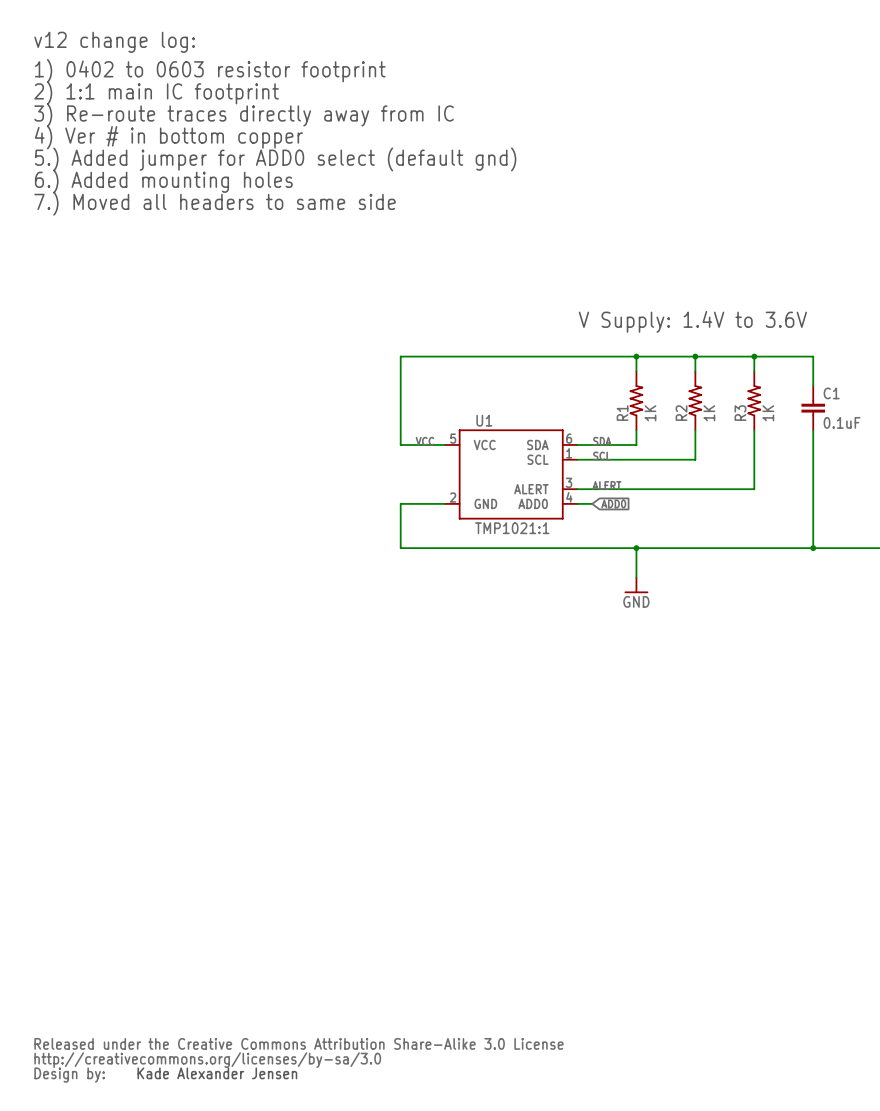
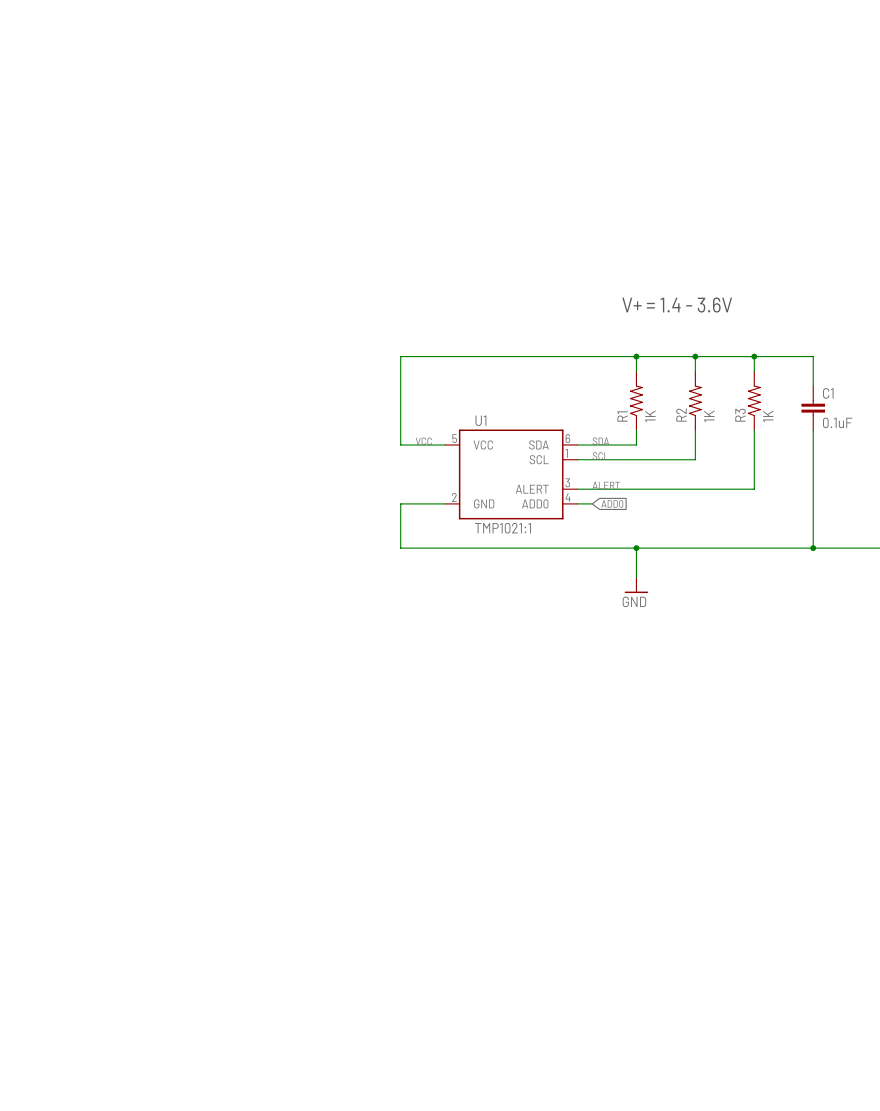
text: v12 change log: (114, 42) -> none
text: 1) 0402 to 0603 resistor footprint (210, 71) -> none
text: 2) 1:1 main IC footprint (156, 93) -> none
text: 3) Re-route traces directly away from IC (244, 115) -> none
text: 4) Ver # in bottom copper (168, 137) -> none
text: 5.) Added jumper for ADD0 select (default gnd) (275, 159) -> none
text: 6.) Added mounting holes (163, 181) -> none
text: 7.) Moved all headers to same side (214, 203) -> none
text: V Supply: 1.4V to 3.6V (692, 321) -> V+ = 1.4 - 3.6V (677, 305)
part: (299, 1060) -> none
text: Kade Alexander Jensen (217, 1073) -> none

